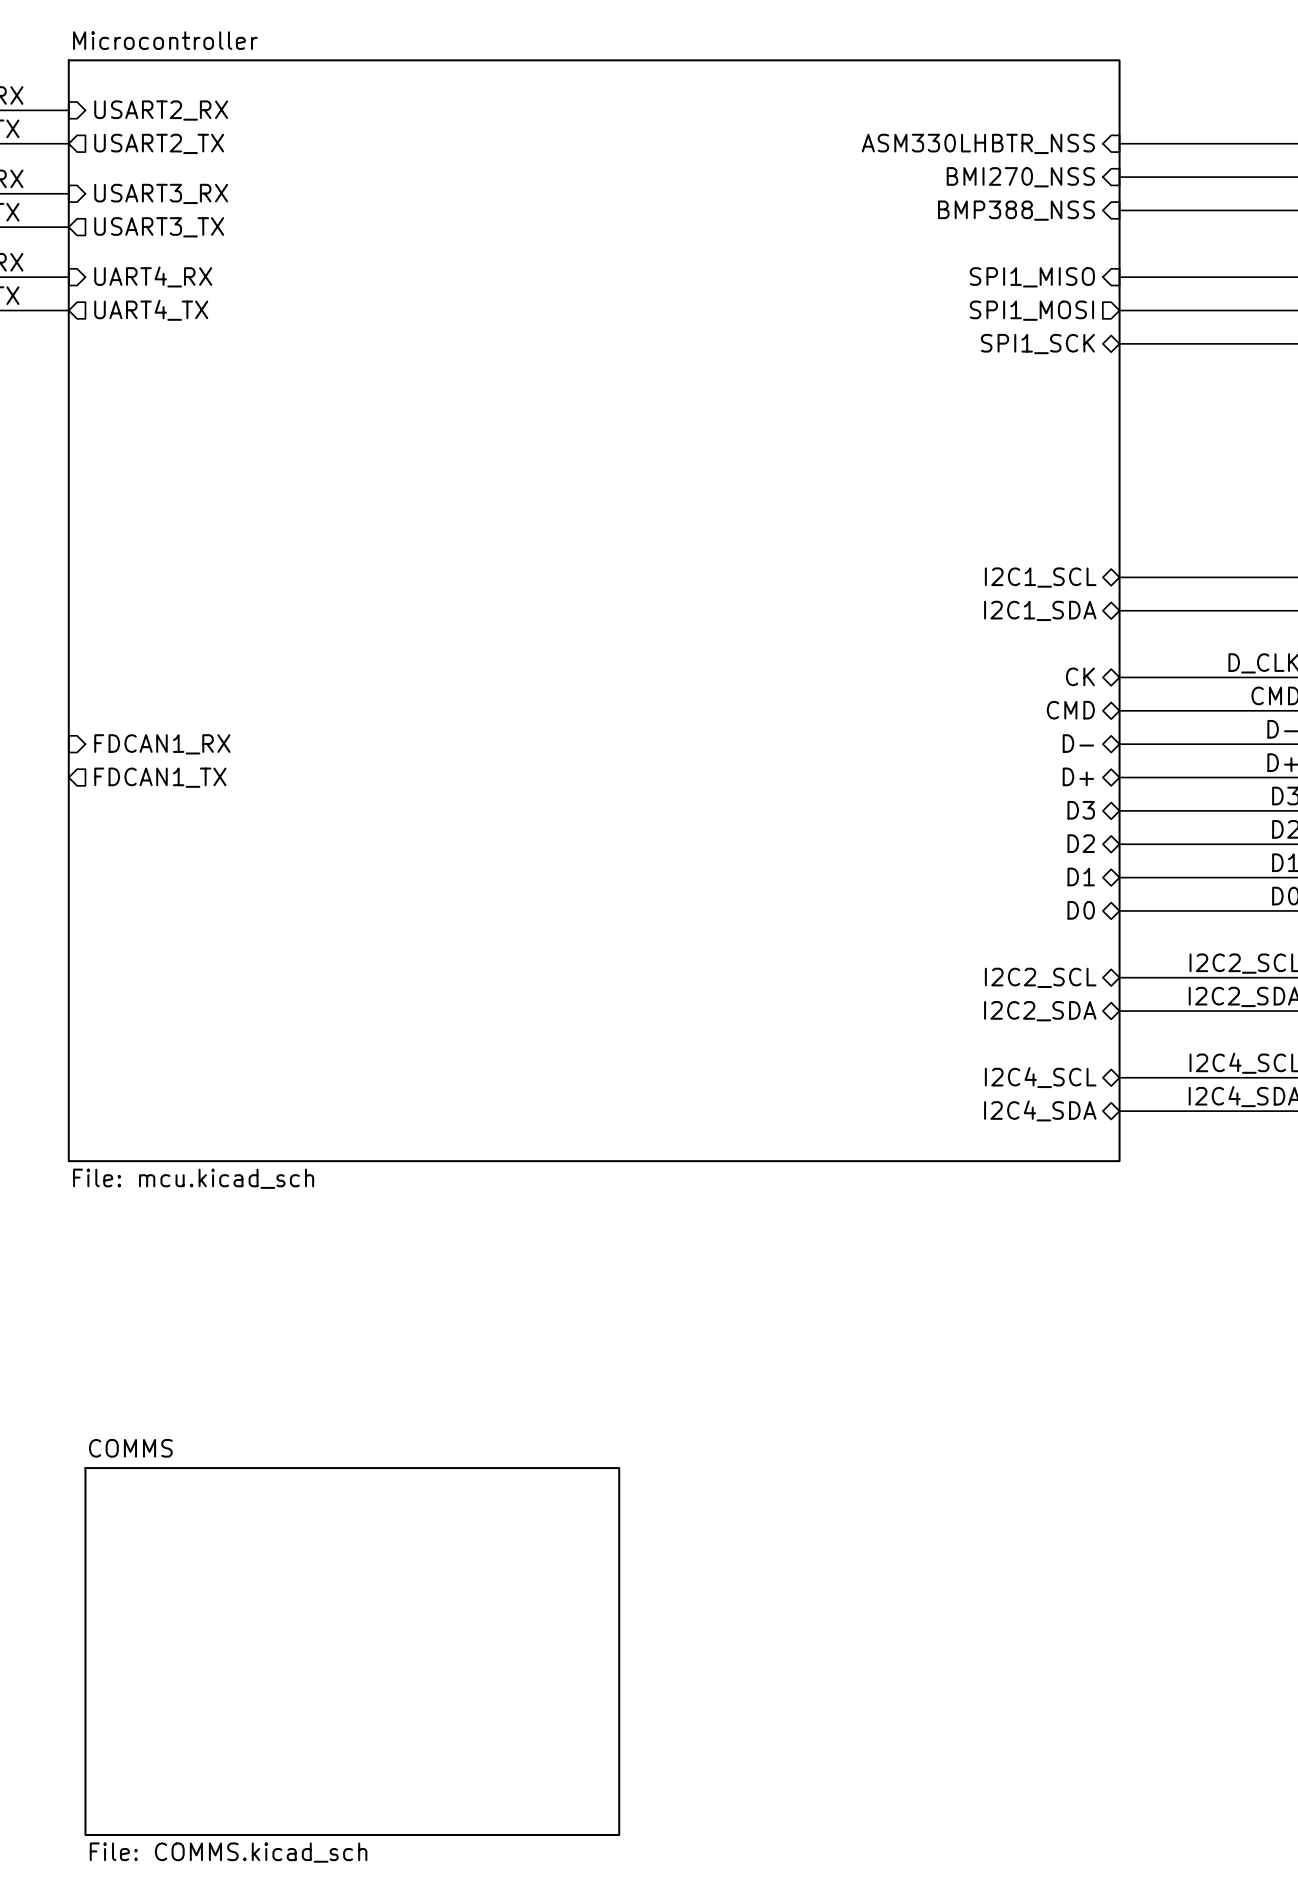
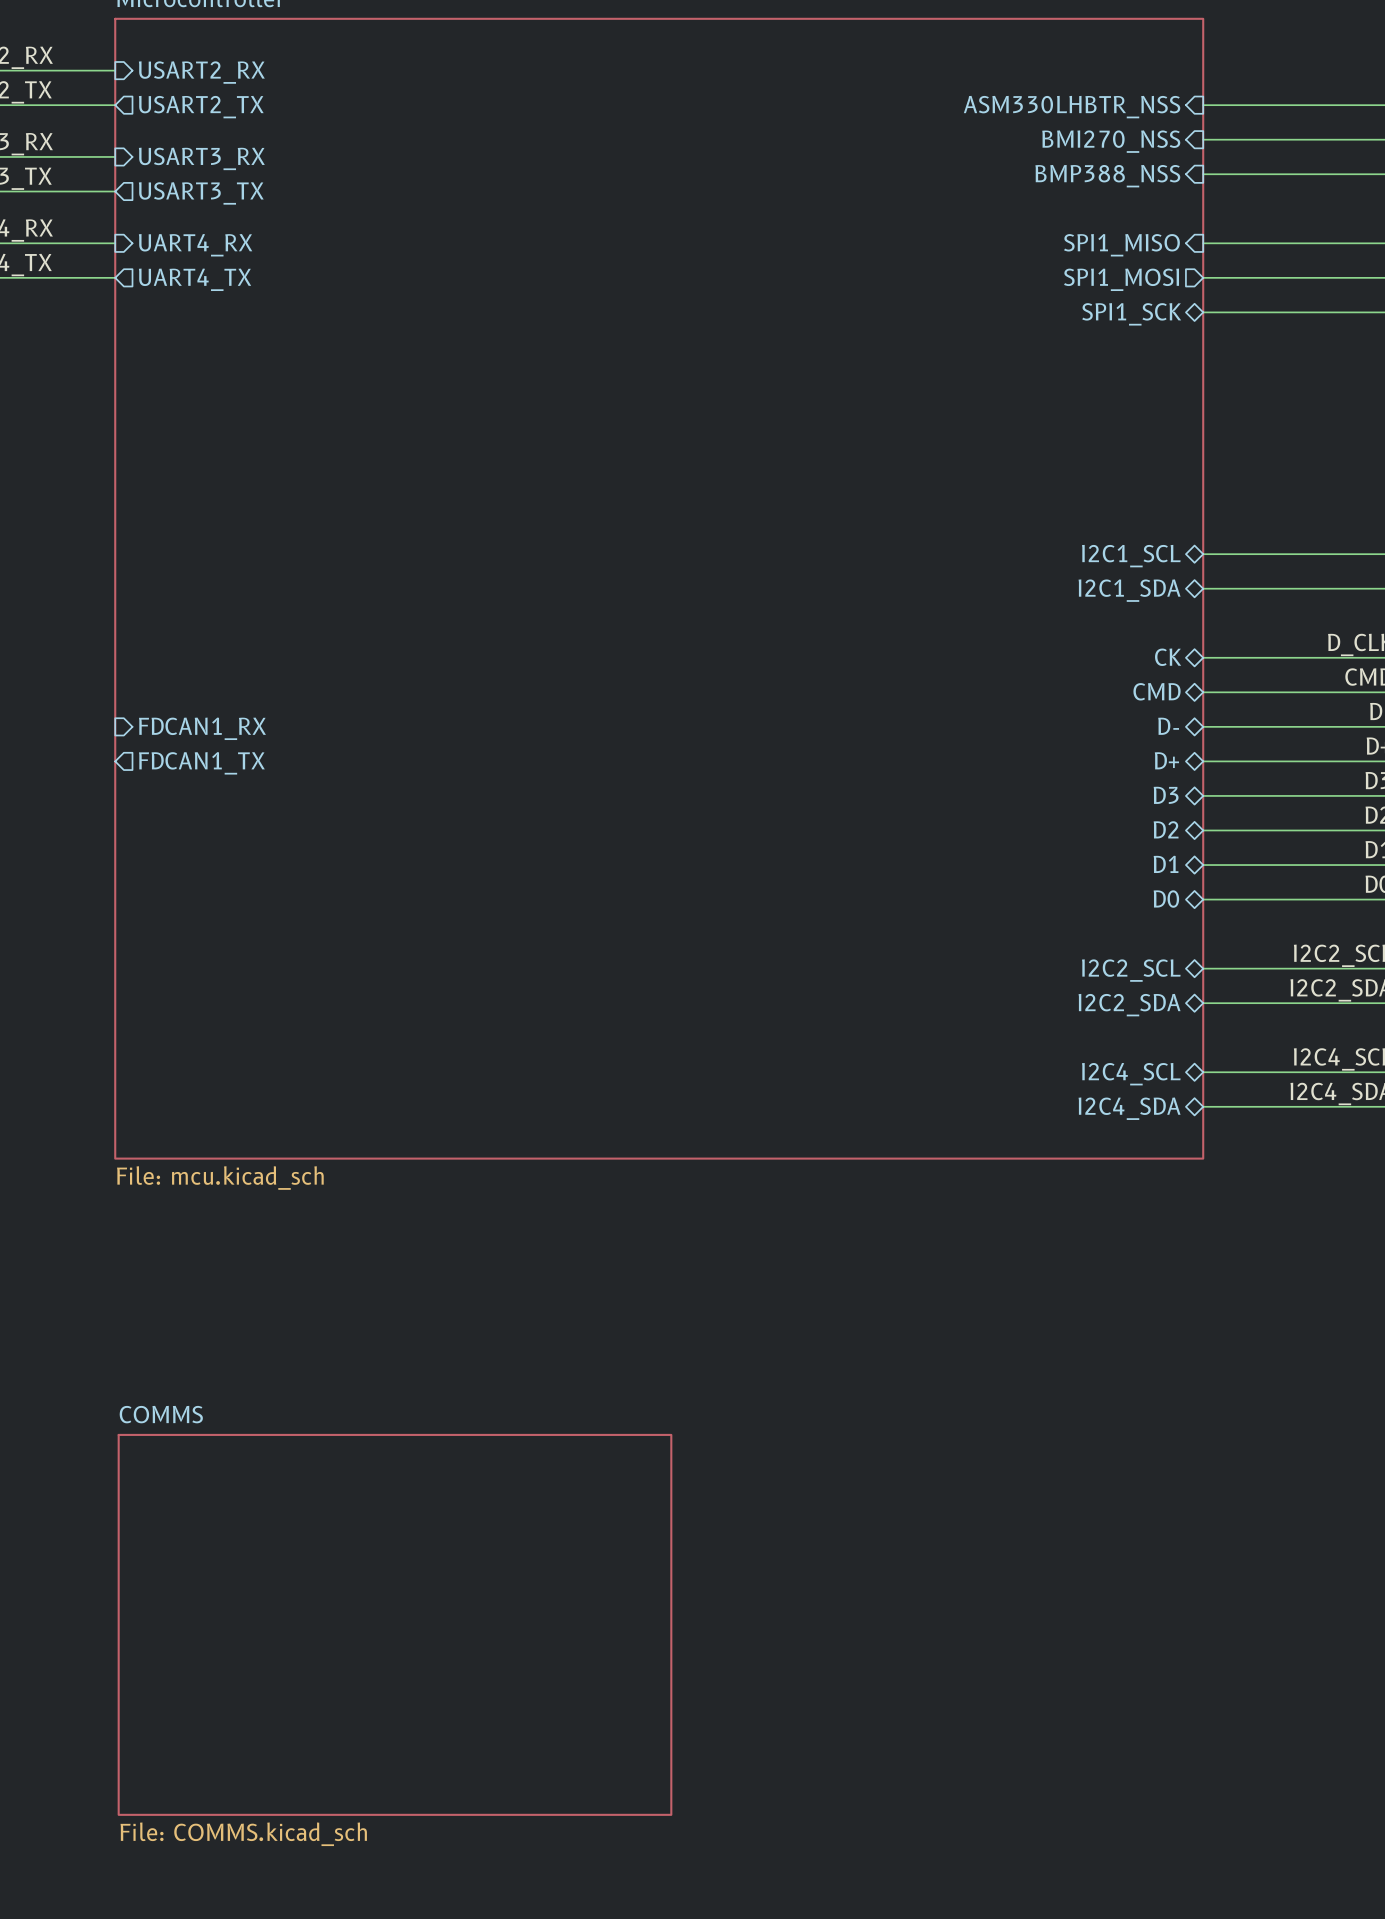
sheet COMMS position: (352, 1651) -> (395, 1624)

